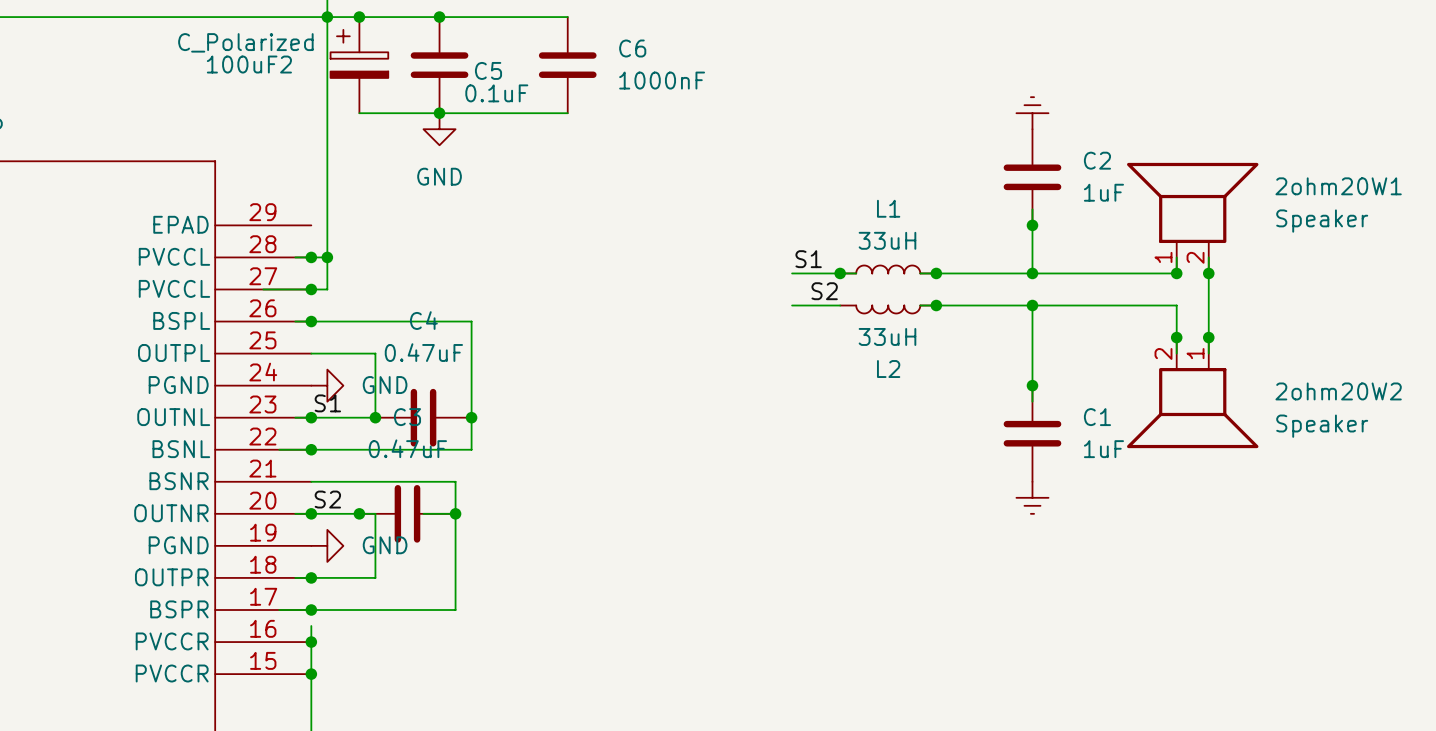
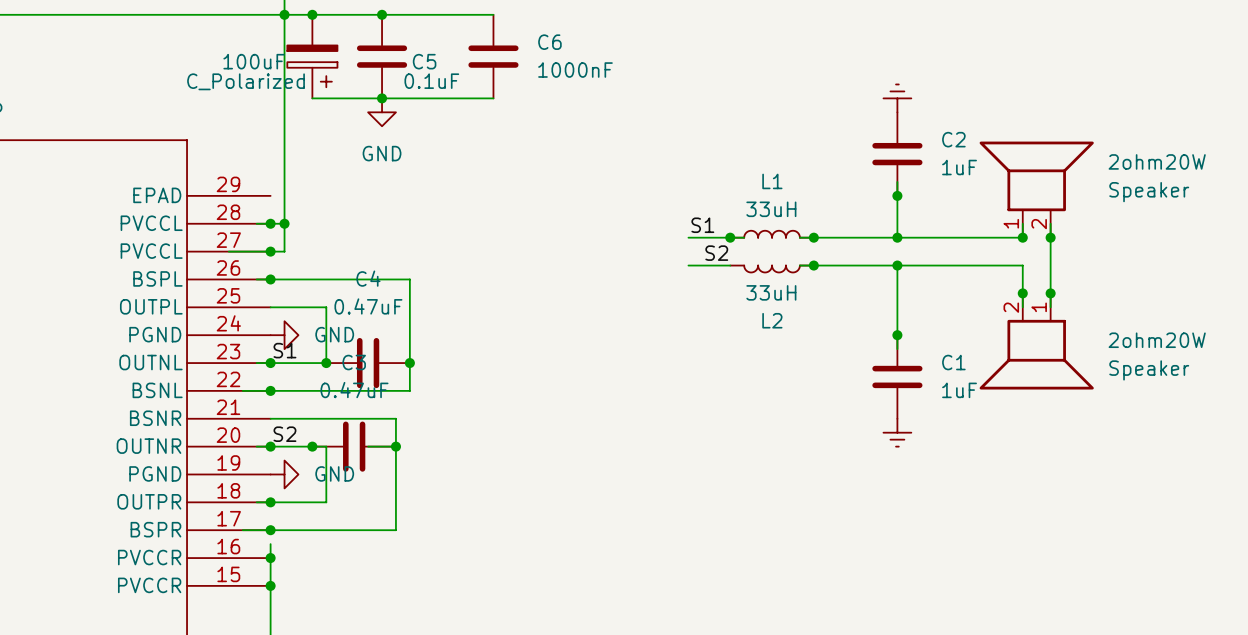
100uF2: C_Polarized (359, 65) -> none
100uF: none -> C_Polarized (312, 56)
2ohm20W1 name: 2ohm20W1 (1338, 186) -> 2ohm20W (1157, 161)
2ohm20W2 name: 2ohm20W2 (1338, 391) -> 2ohm20W (1157, 340)

